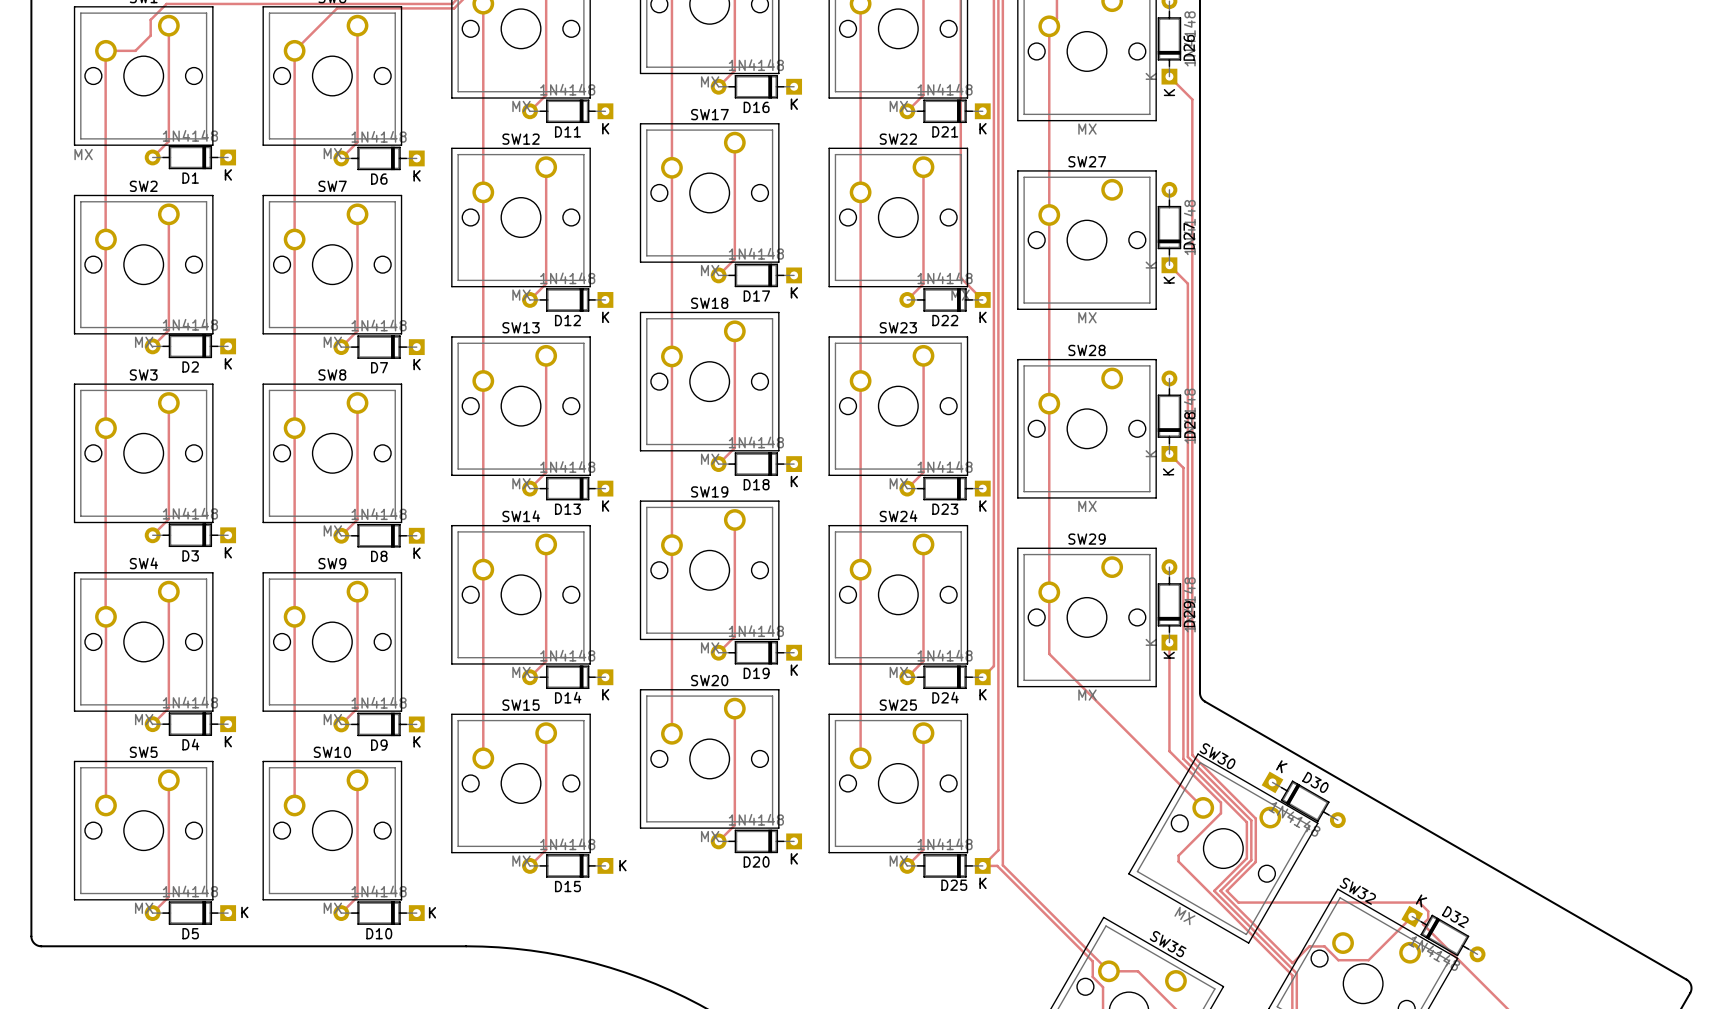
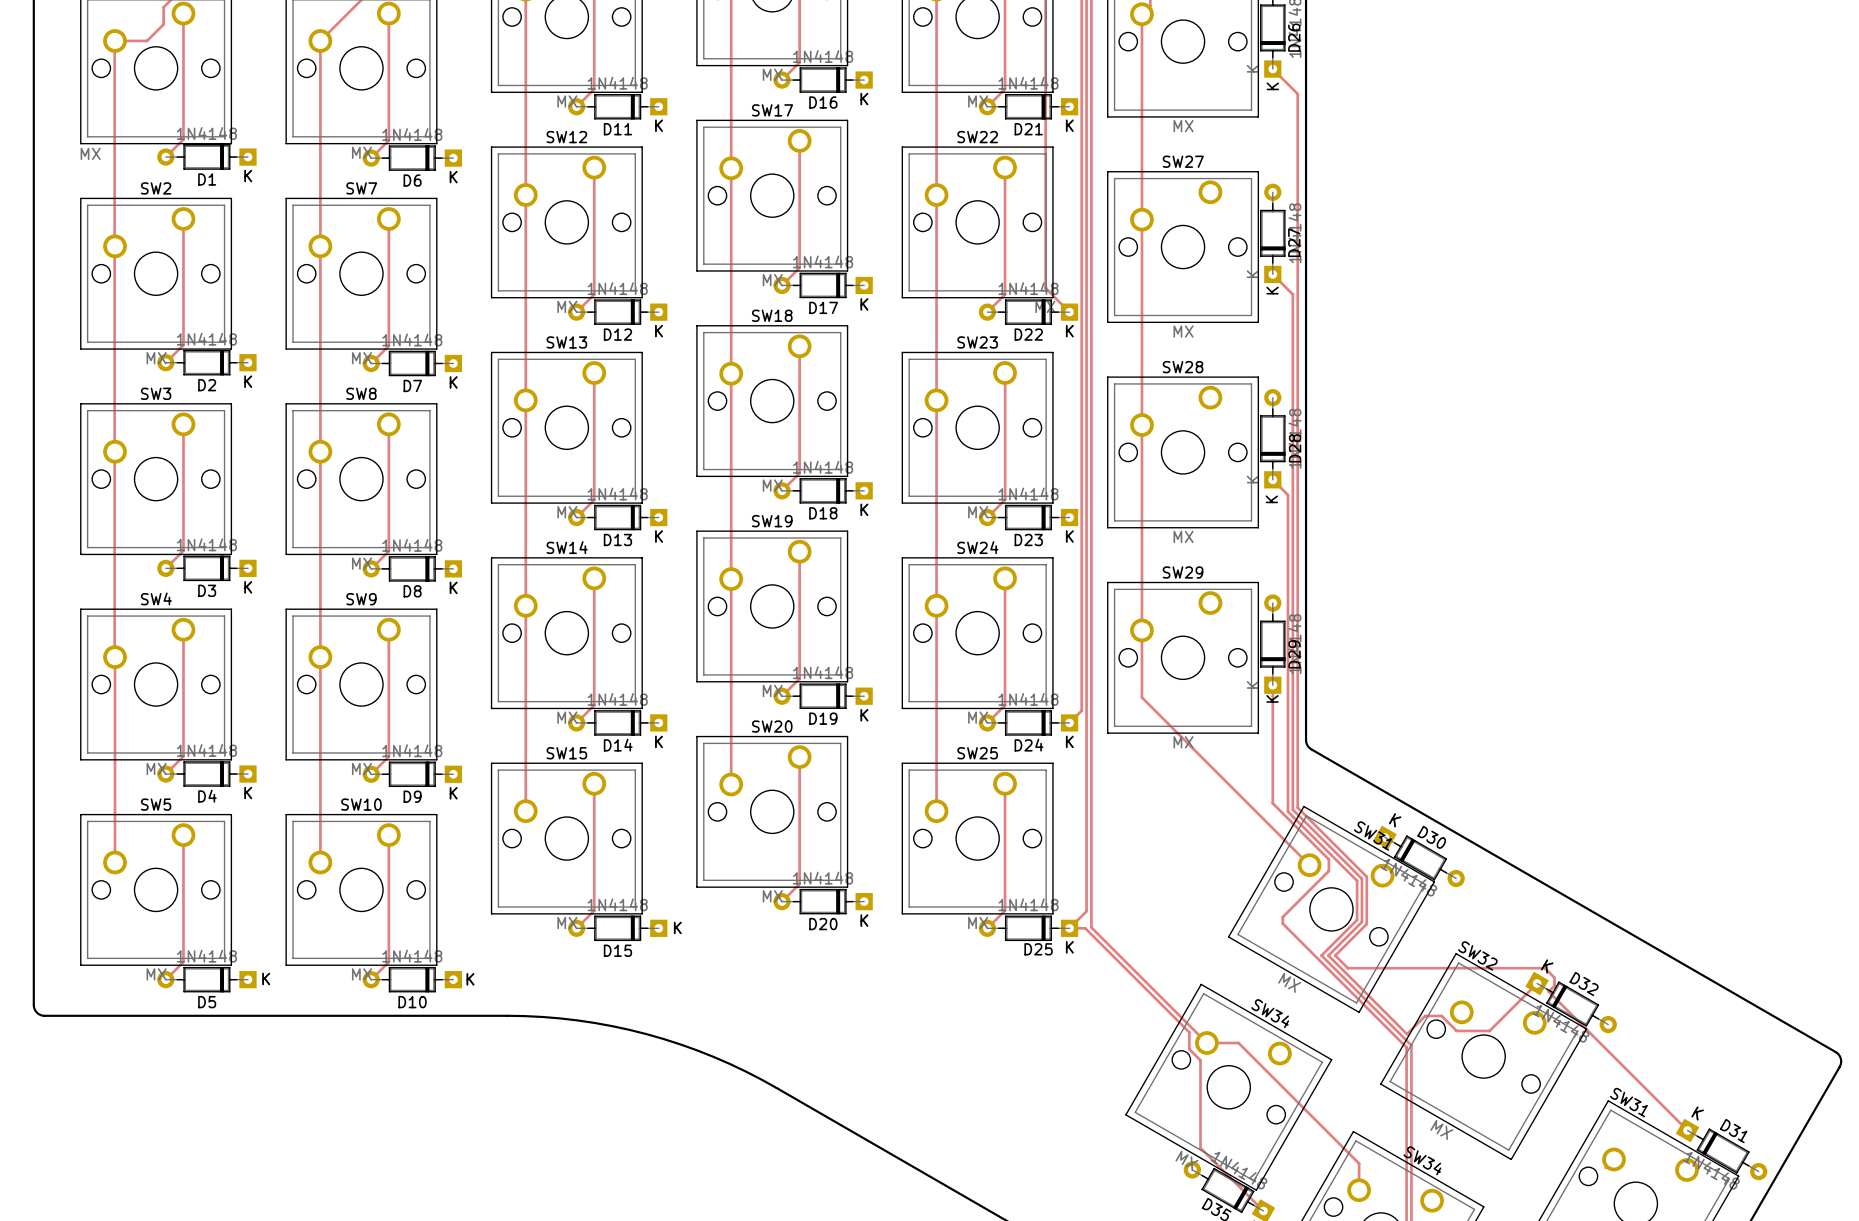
SW30 name: SW30 (1217, 756) -> SW31 (1372, 836)
SW35 name: SW35 (1168, 944) -> SW34 (1270, 1013)

